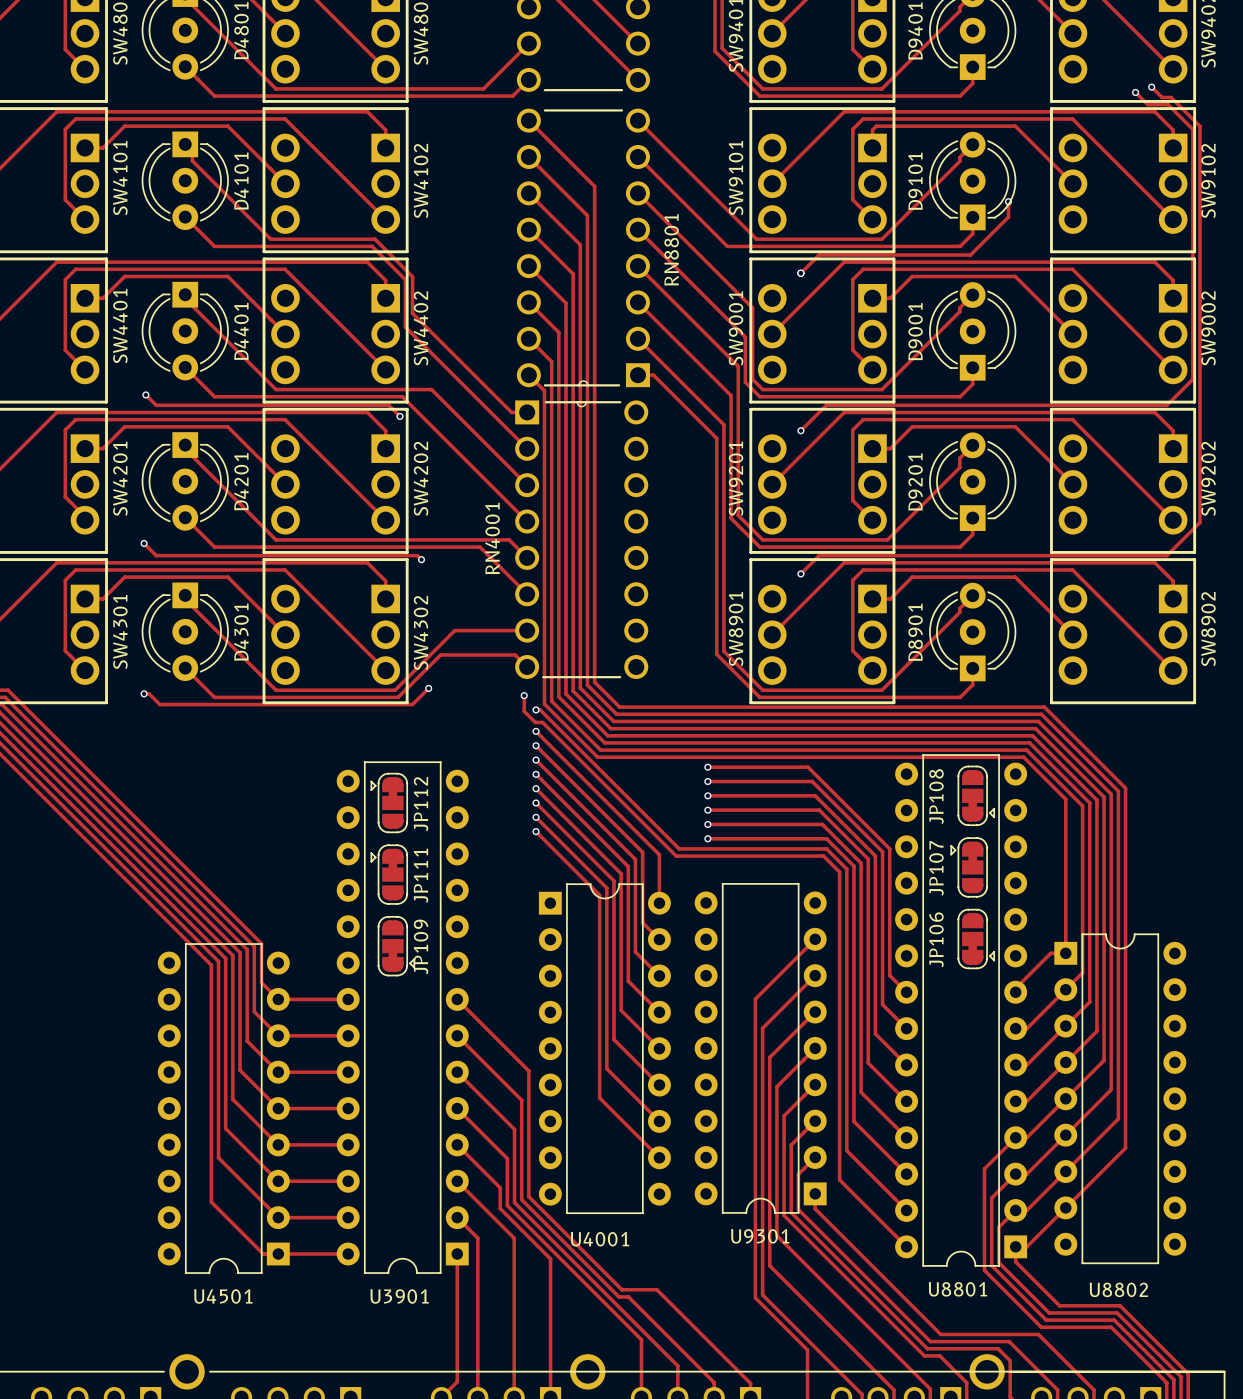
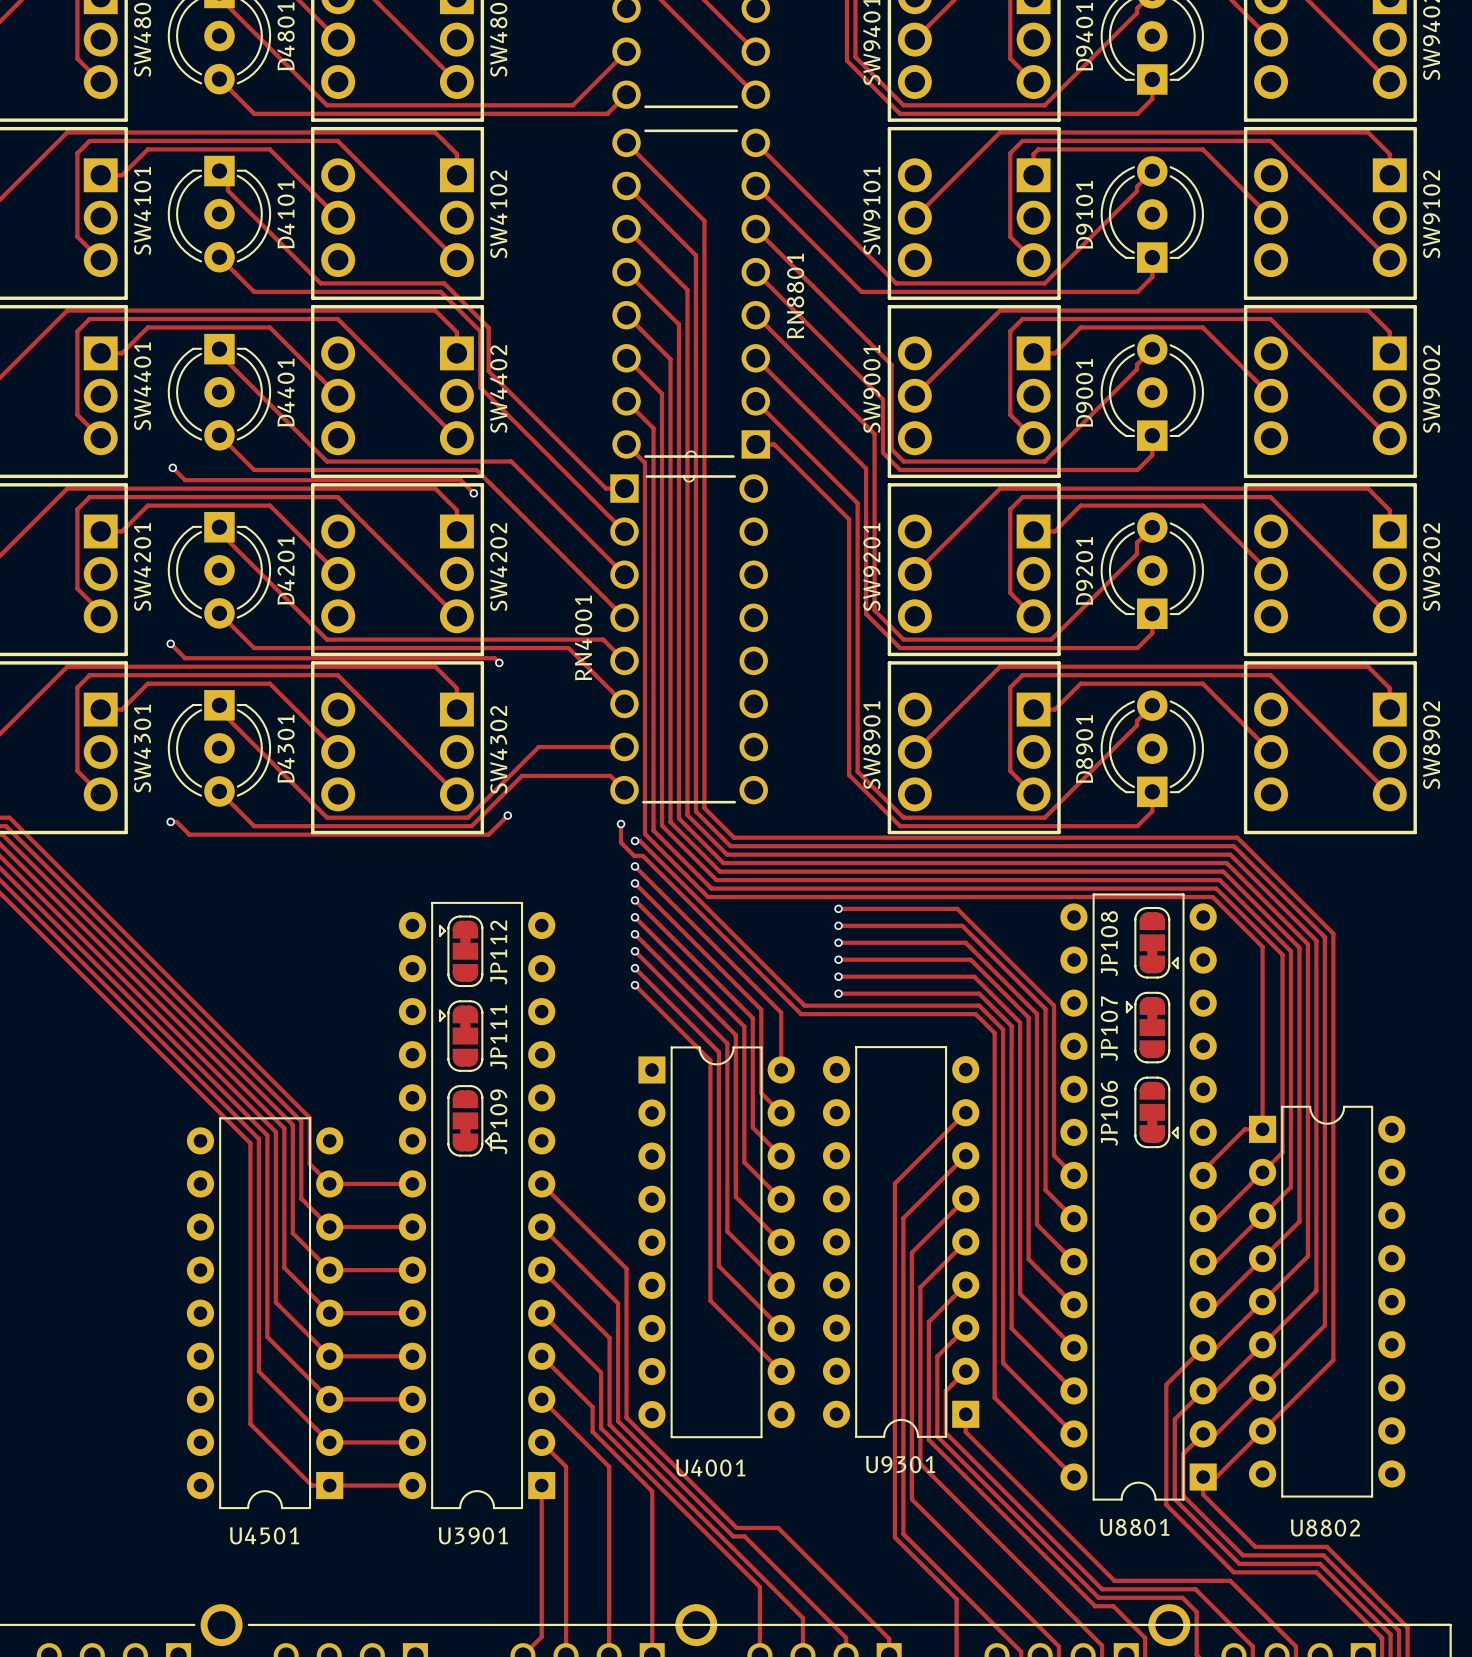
track: (1151, 87) (1162, 97) (1171, 97) (1200, 126) (1200, 522) (1166, 555) (819, 555) (800, 573) -> none
via: (1151, 87) -> none
track: (1135, 92) (1147, 104) (1168, 104) (1192, 129) (1192, 379) (1166, 405) (826, 405) (800, 430) -> none
via: (1135, 92) -> none
track: (1008, 201) (1008, 217) (970, 254) (819, 254) (800, 273) -> none
via: (1008, 201) -> none
via: (800, 273) -> none
via: (800, 430) -> none
via: (800, 573) -> none

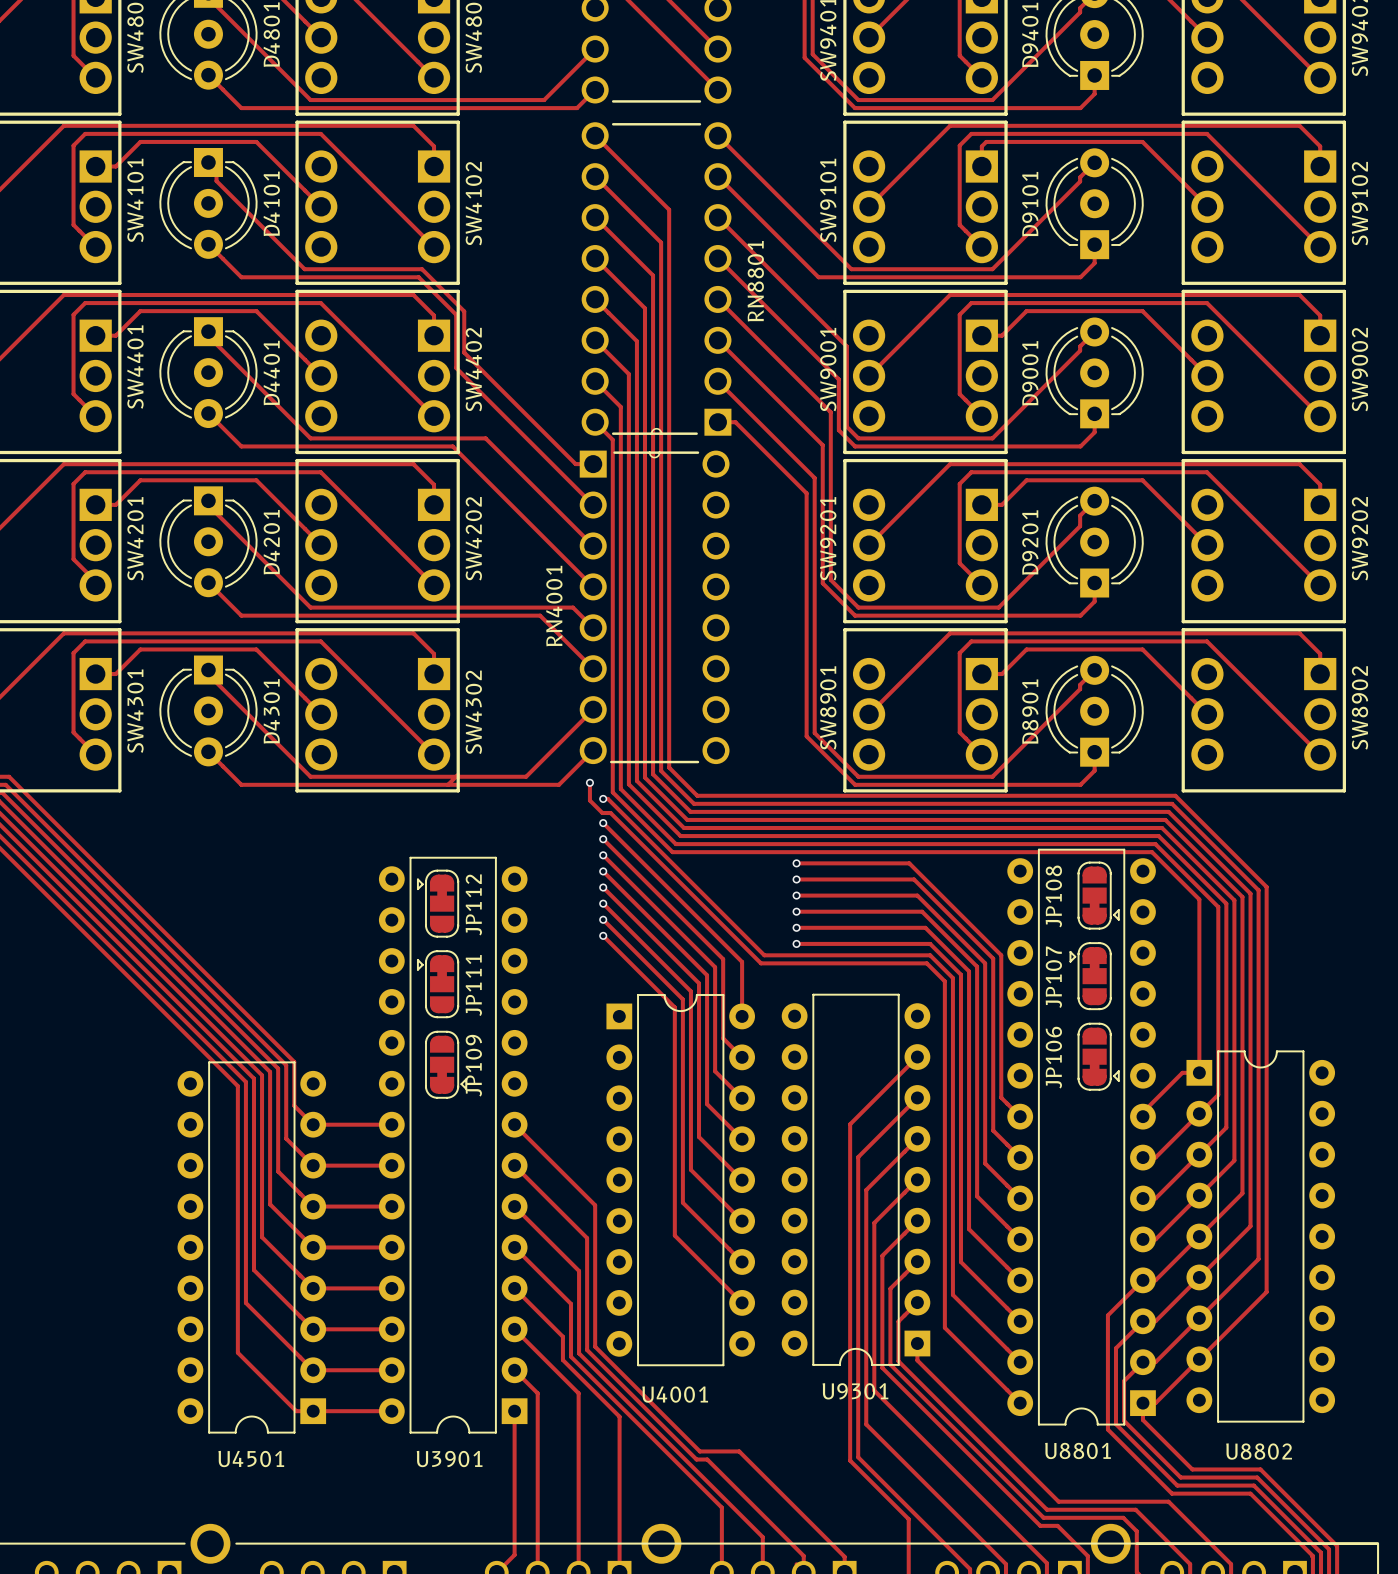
track: (172, 467) (185, 480) (460, 480) (473, 493) -> none
via: (172, 467) -> none
via: (473, 493) -> none
track: (170, 643) (185, 658) (494, 658) (499, 662) -> none
via: (170, 643) -> none
via: (499, 662) -> none
track: (624, 747) (538, 747) (468, 817) -> (593, 709) (526, 776) (444, 776)
track: (624, 790) (610, 775) (522, 775) (482, 815) -> (593, 750) (558, 784) (448, 784)
track: (507, 815) (488, 834) (189, 834) (176, 821) (170, 821) -> none
via: (507, 815) -> none
via: (170, 821) -> none

